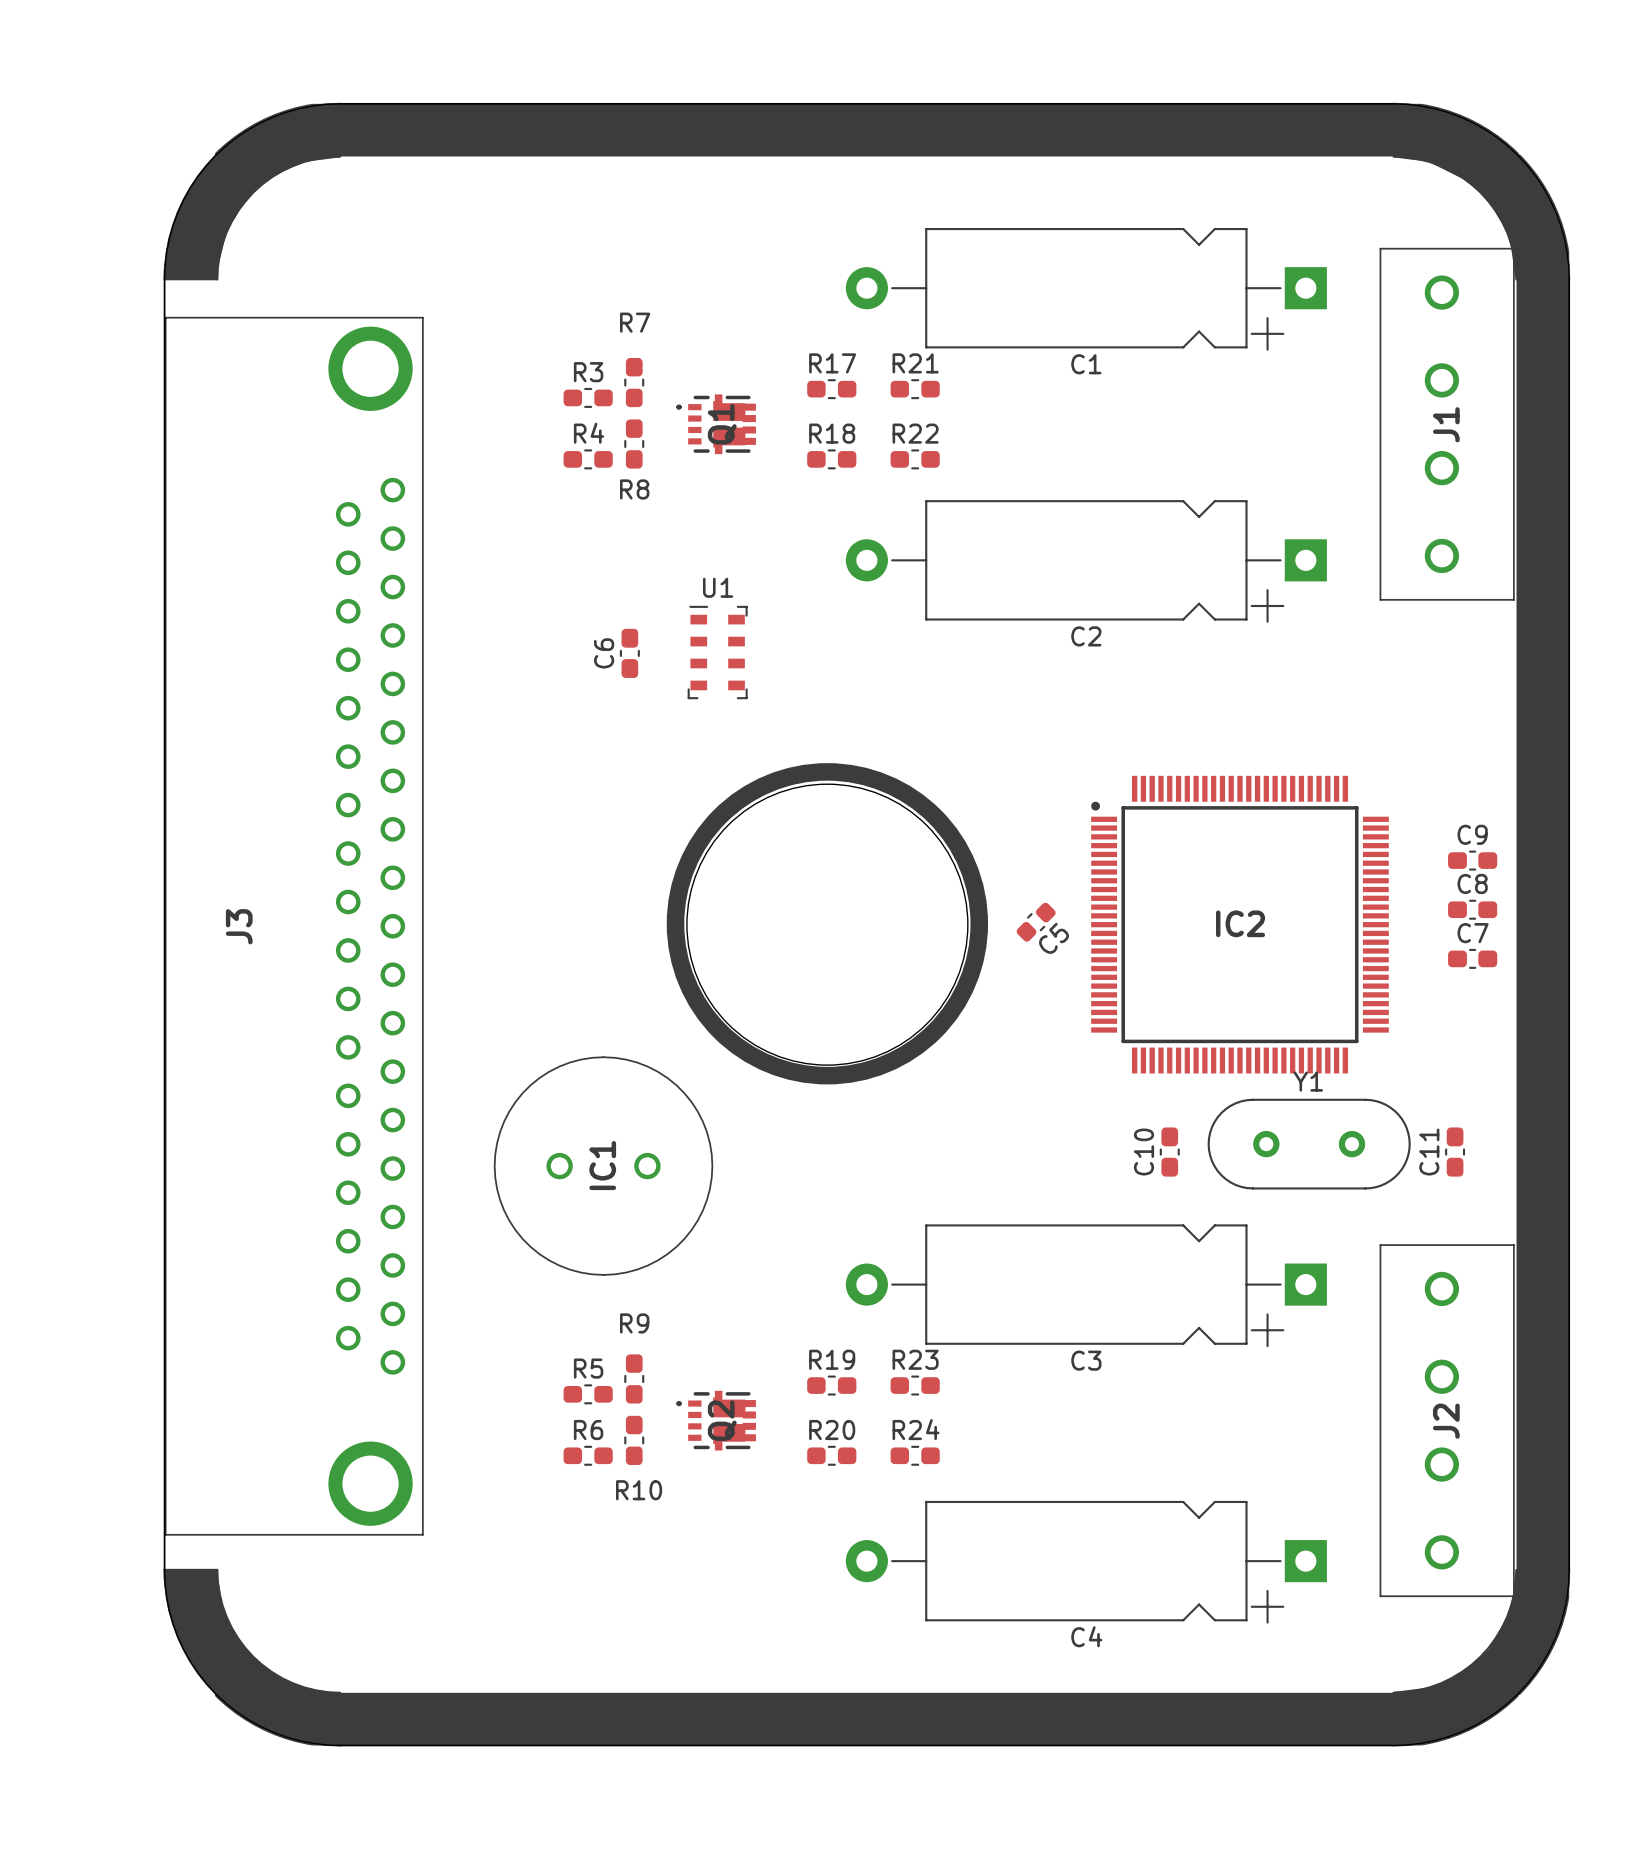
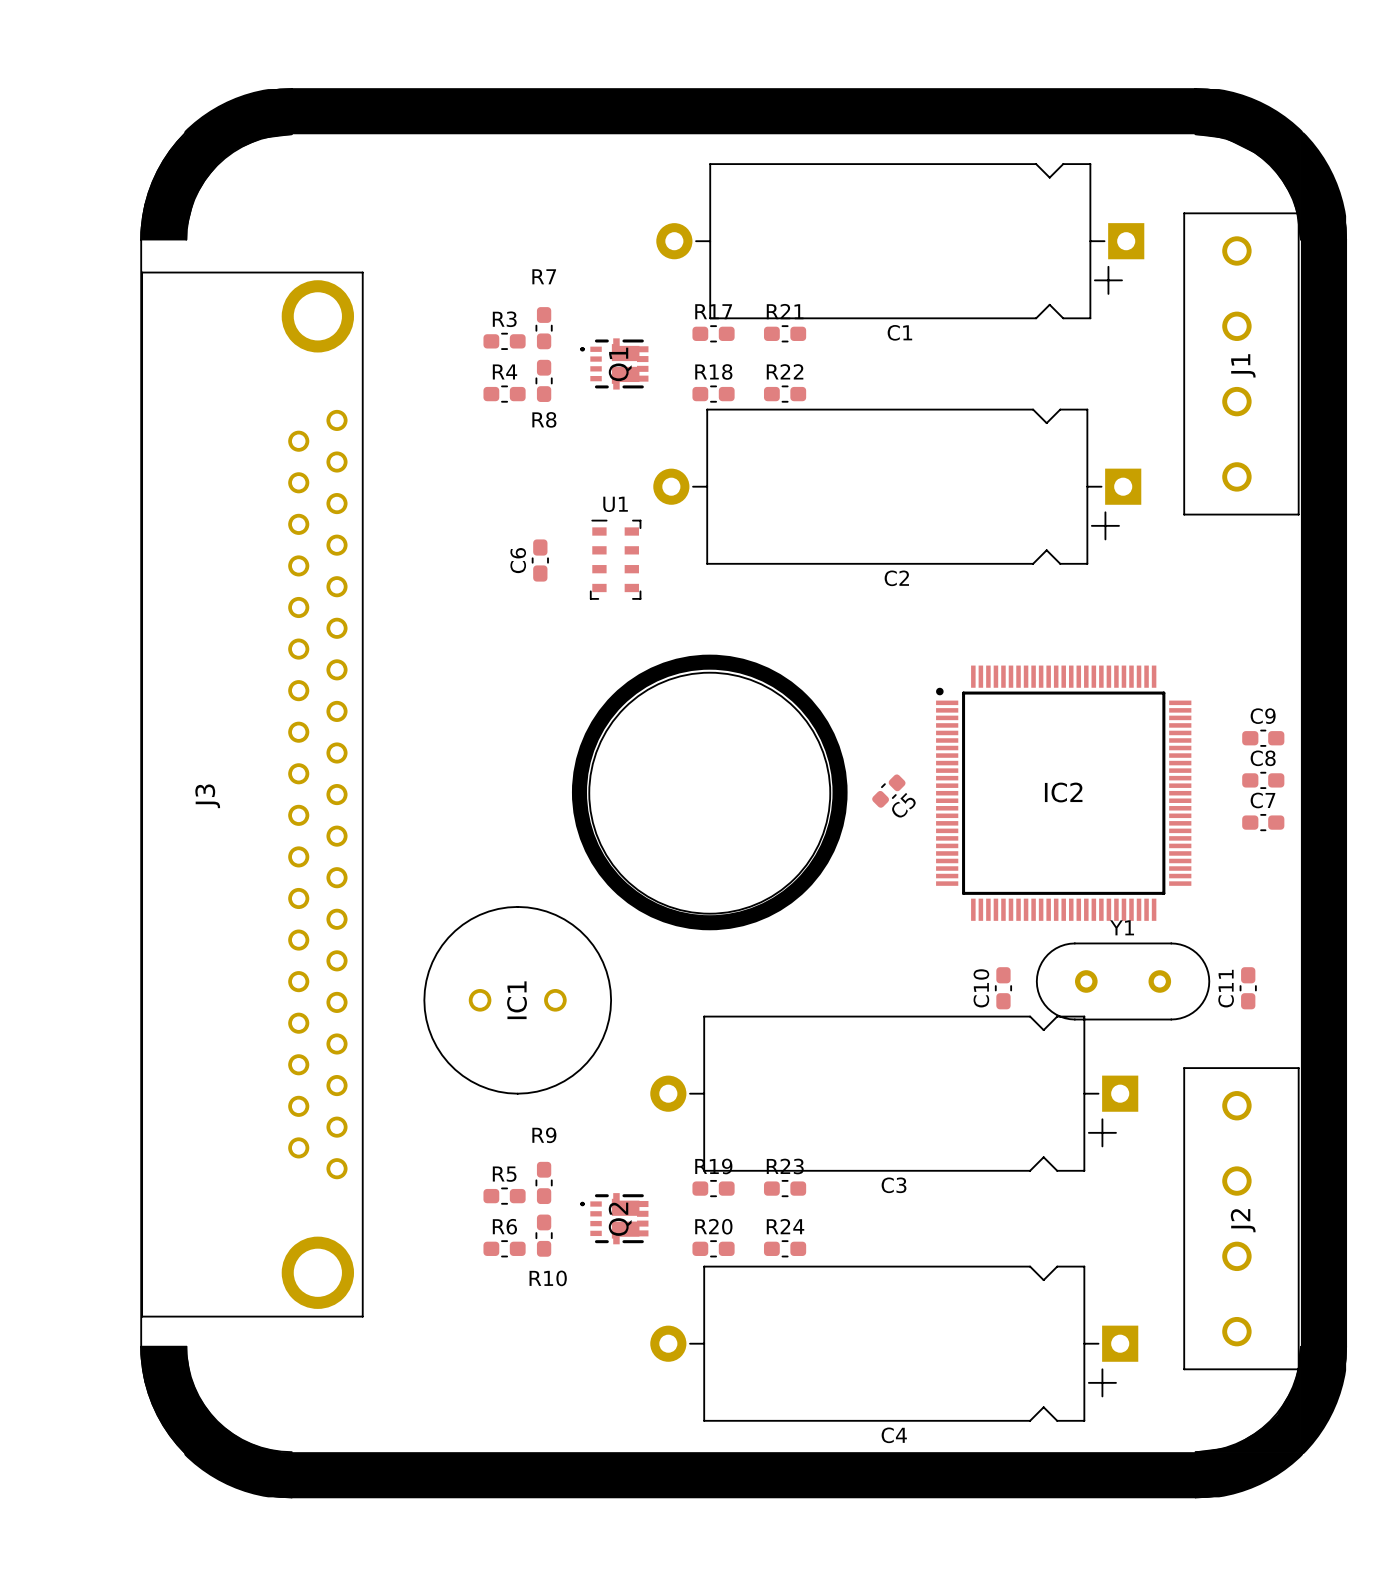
C1 footprint: [845, 227, 1327, 351] -> [656, 163, 1145, 320]
C2 footprint: [845, 500, 1327, 623] -> [653, 408, 1142, 565]
C3 footprint: [845, 1224, 1327, 1348] -> [650, 1015, 1139, 1172]
C4 footprint: [845, 1500, 1327, 1624] -> [650, 1265, 1139, 1422]

